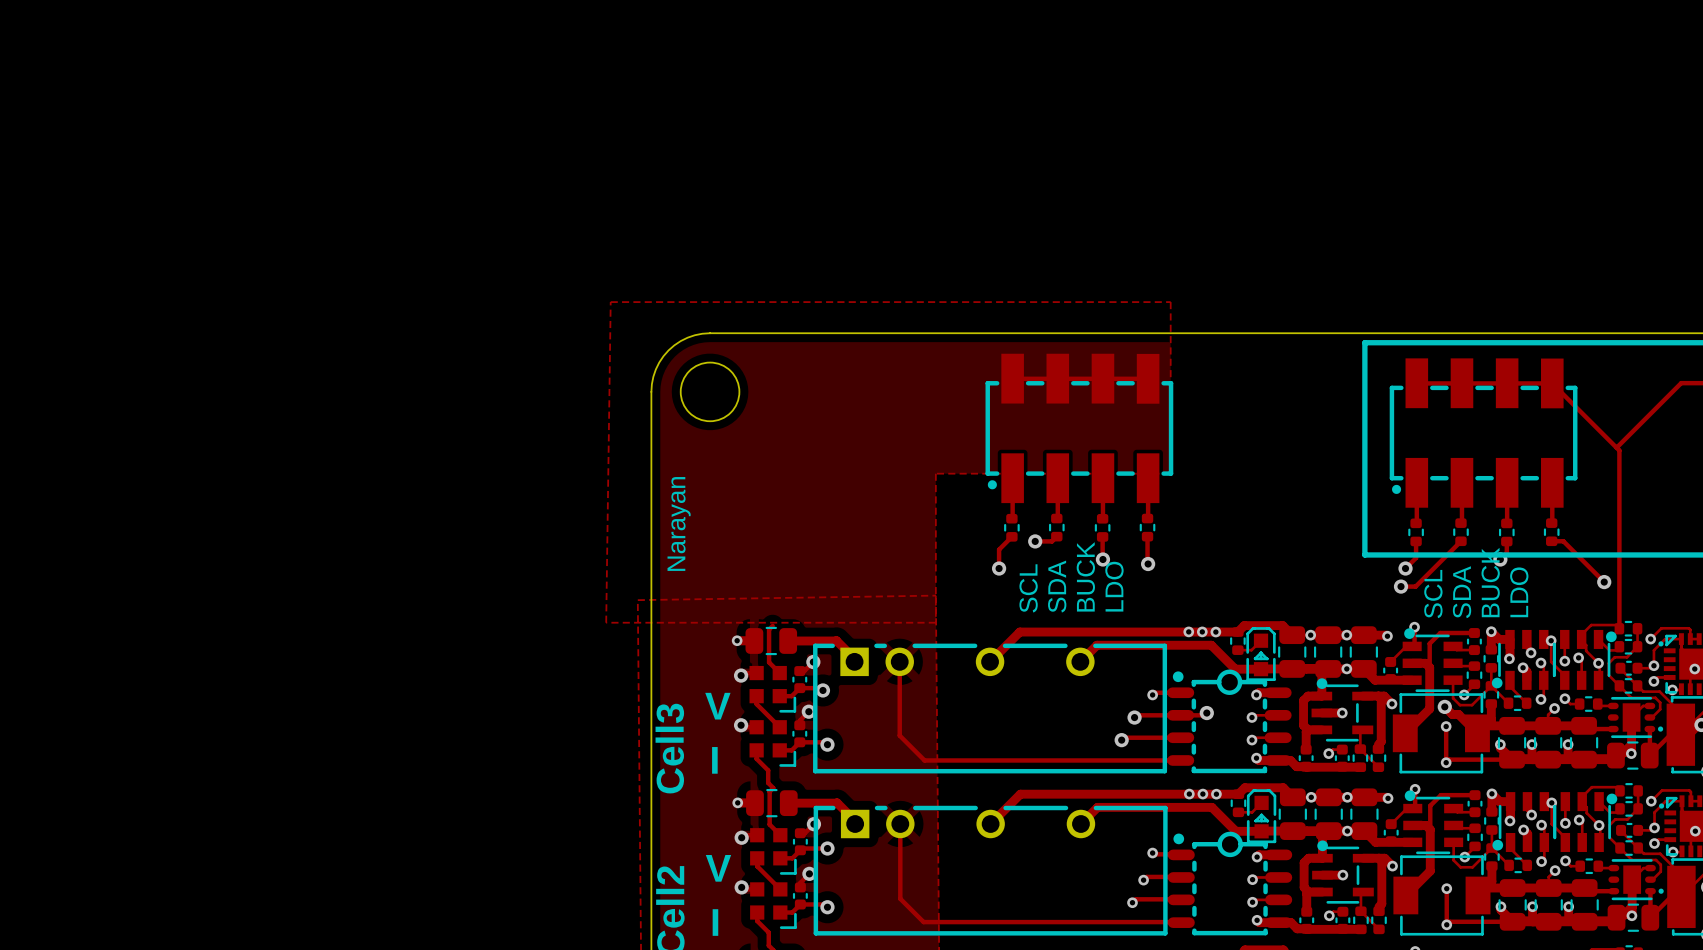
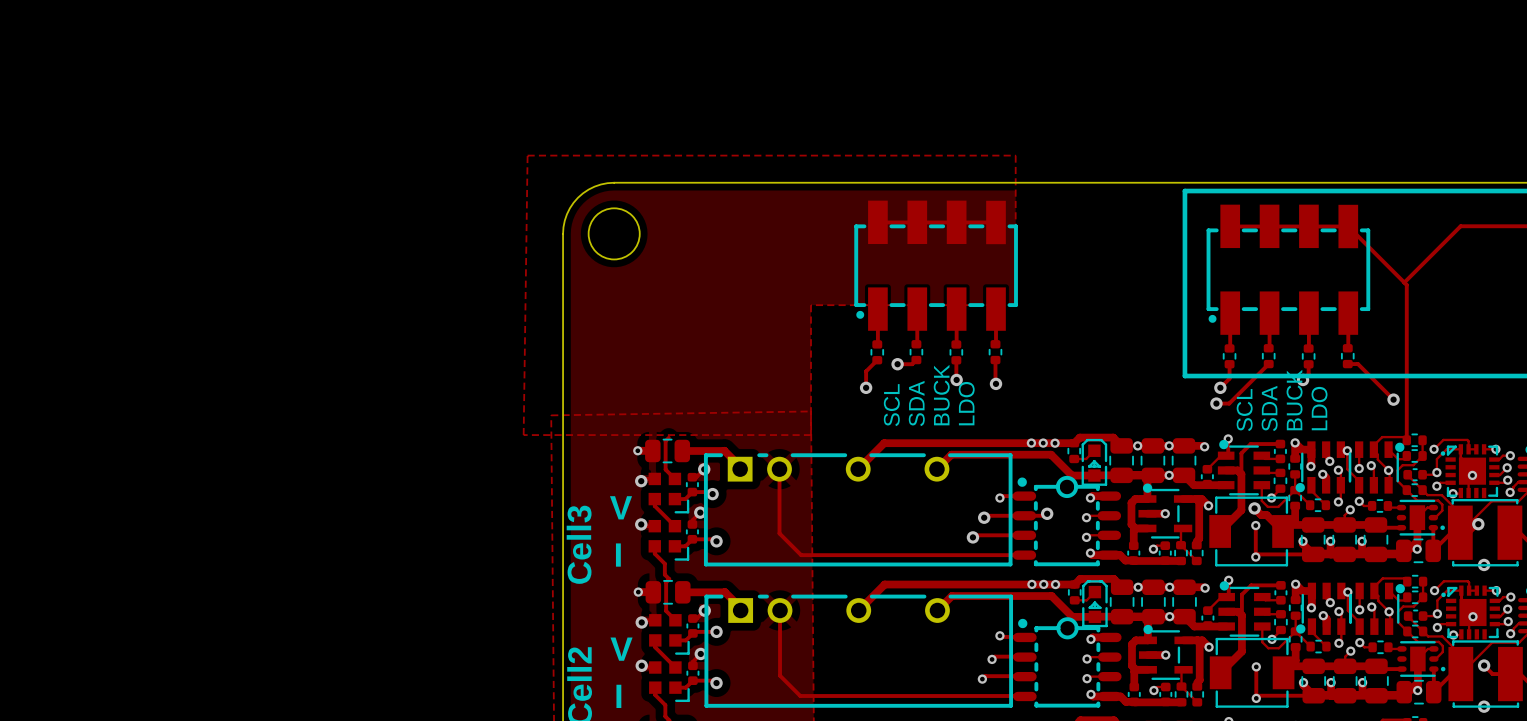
text: Narayan (679, 523) -> none

